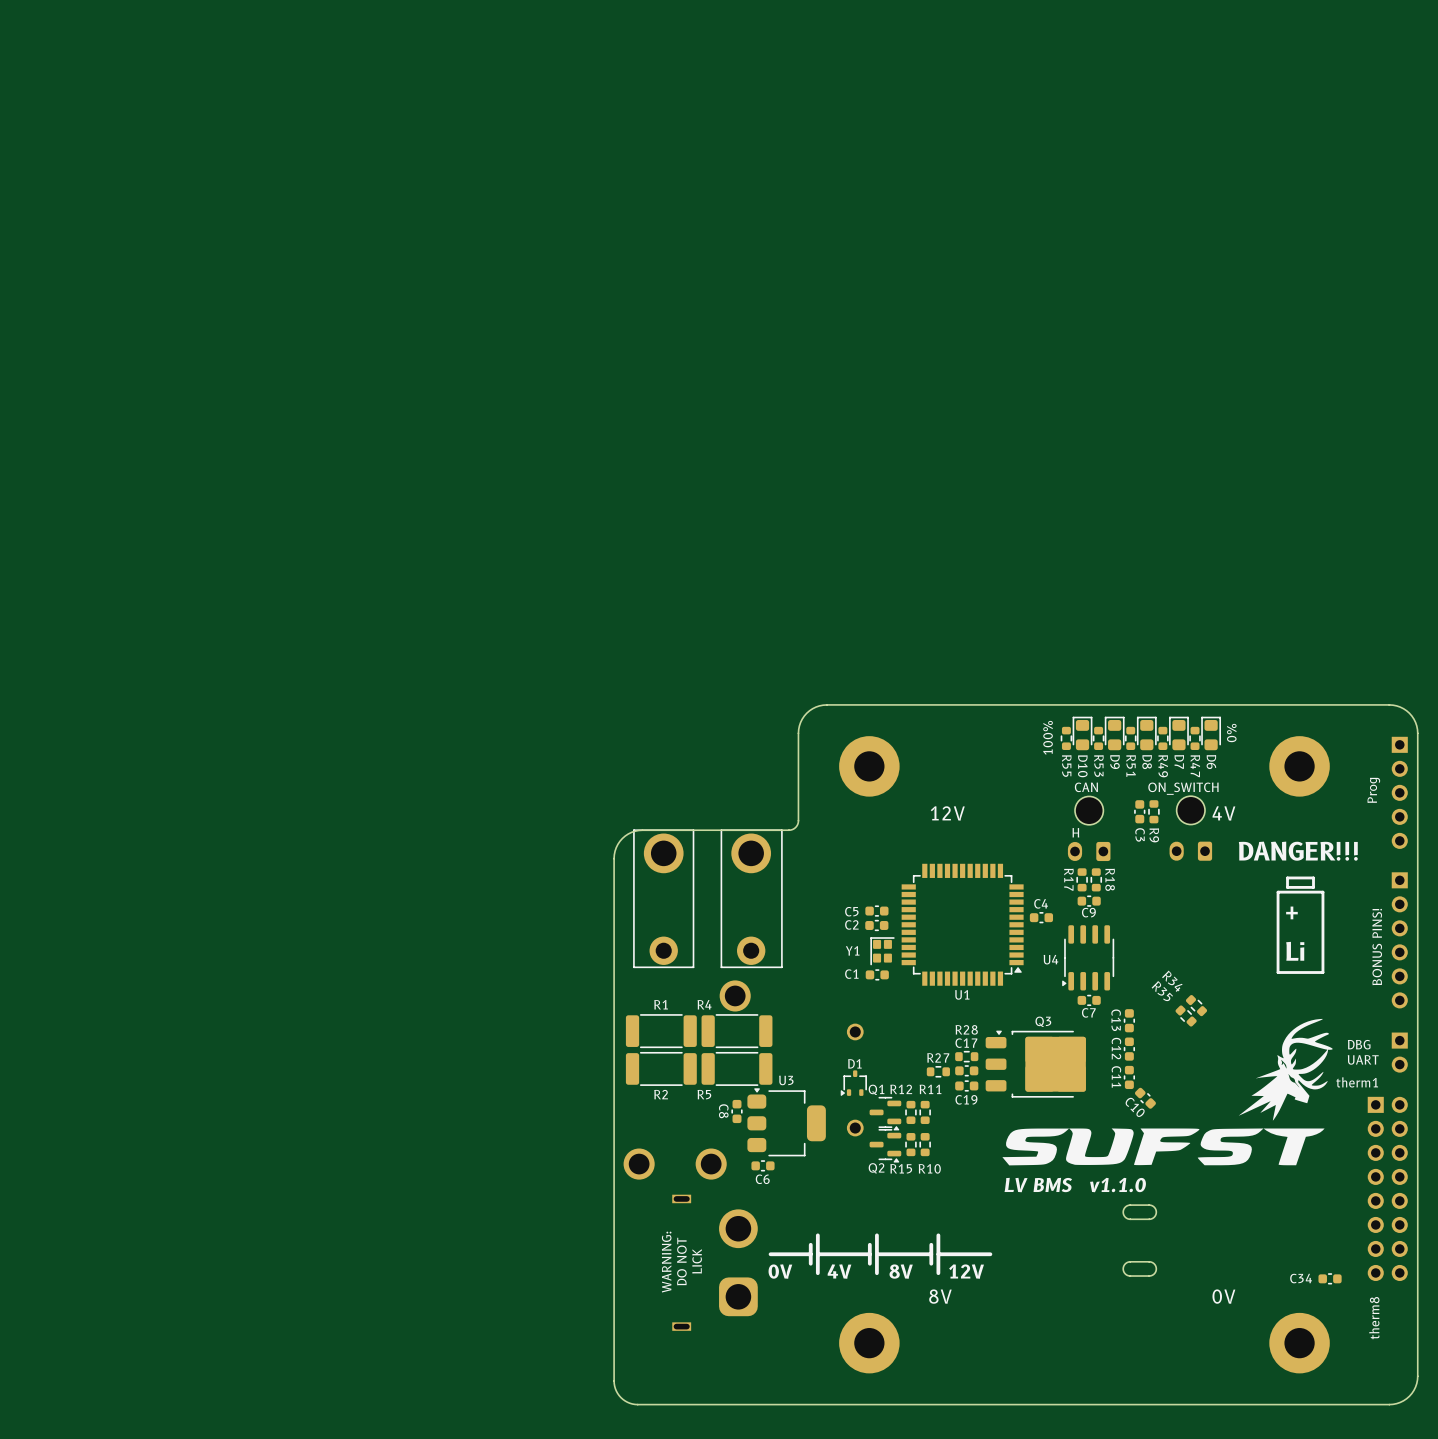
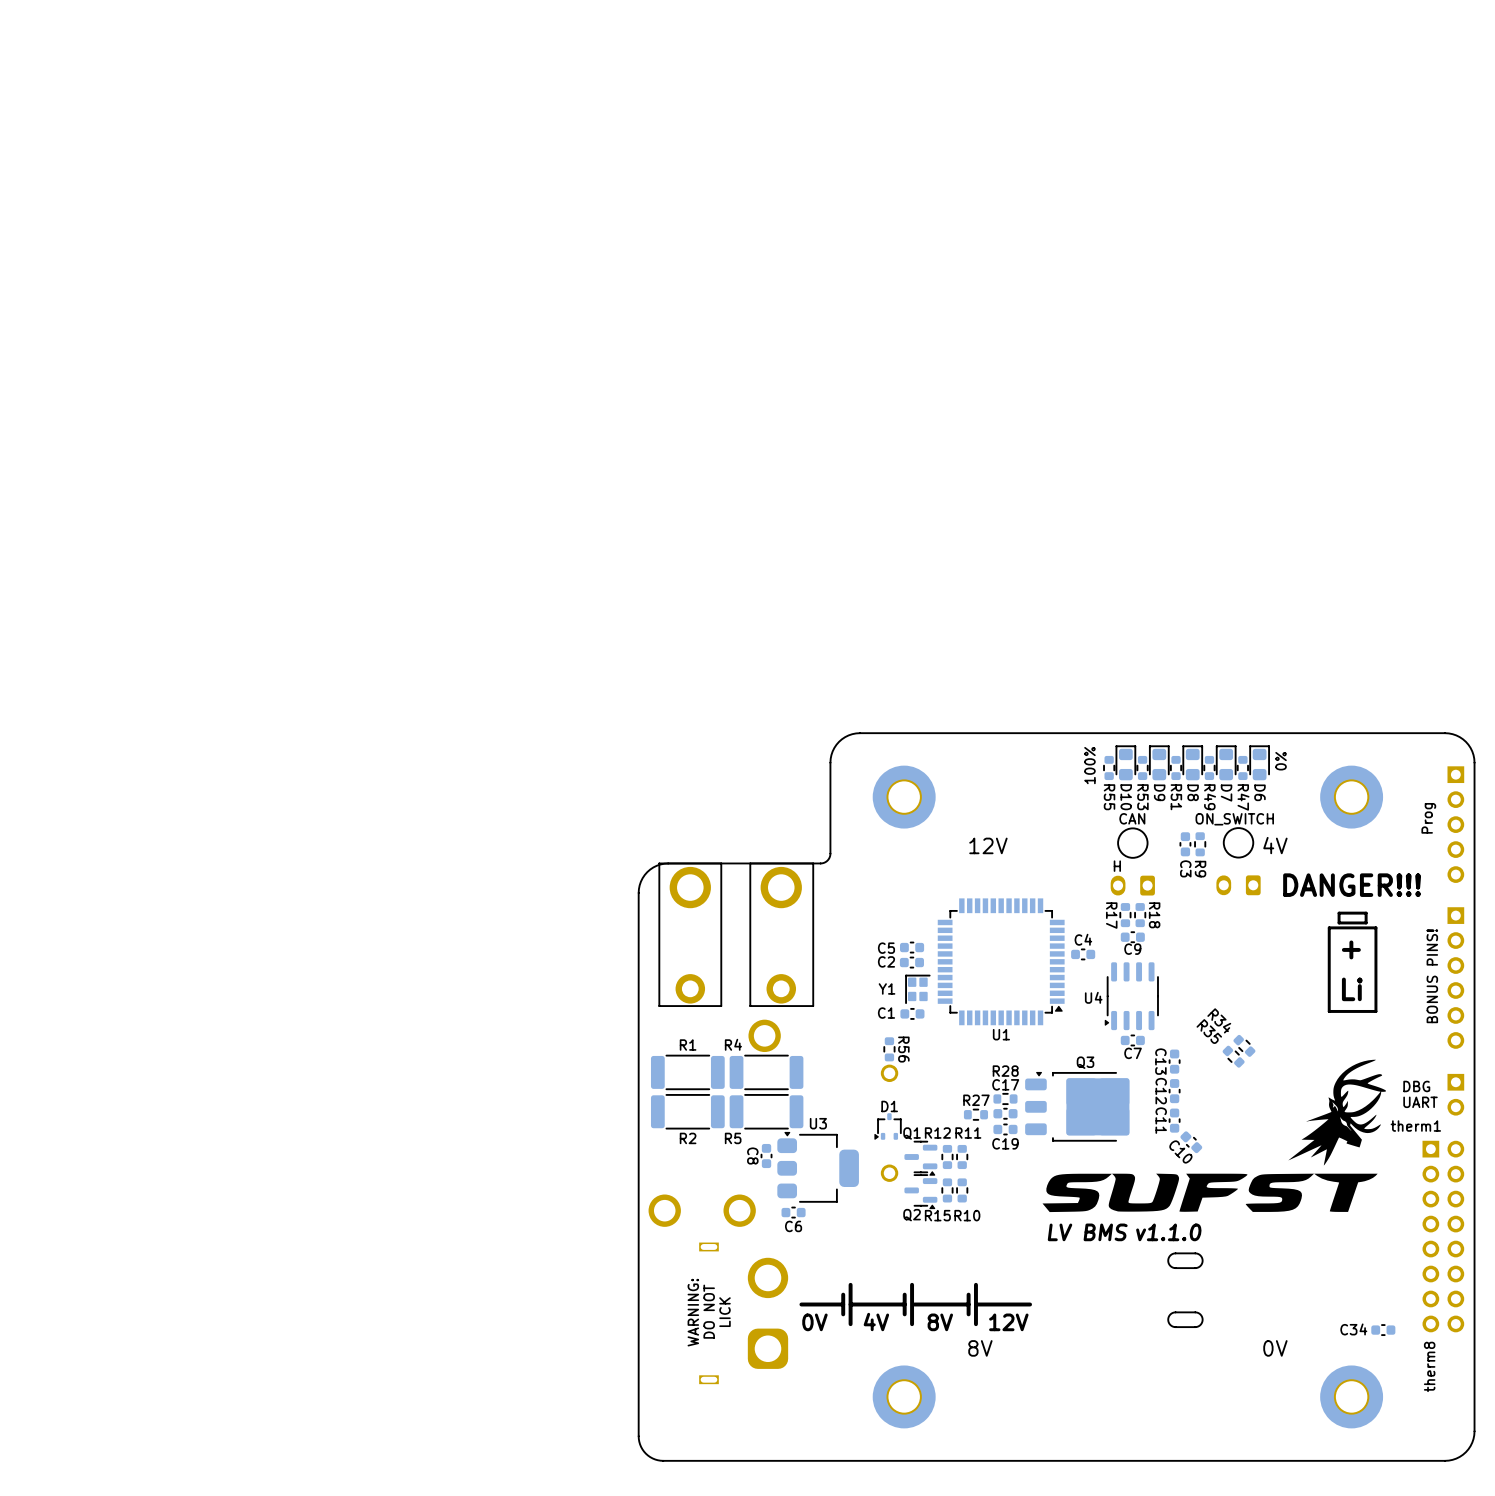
R56: none -> (889, 1049)

